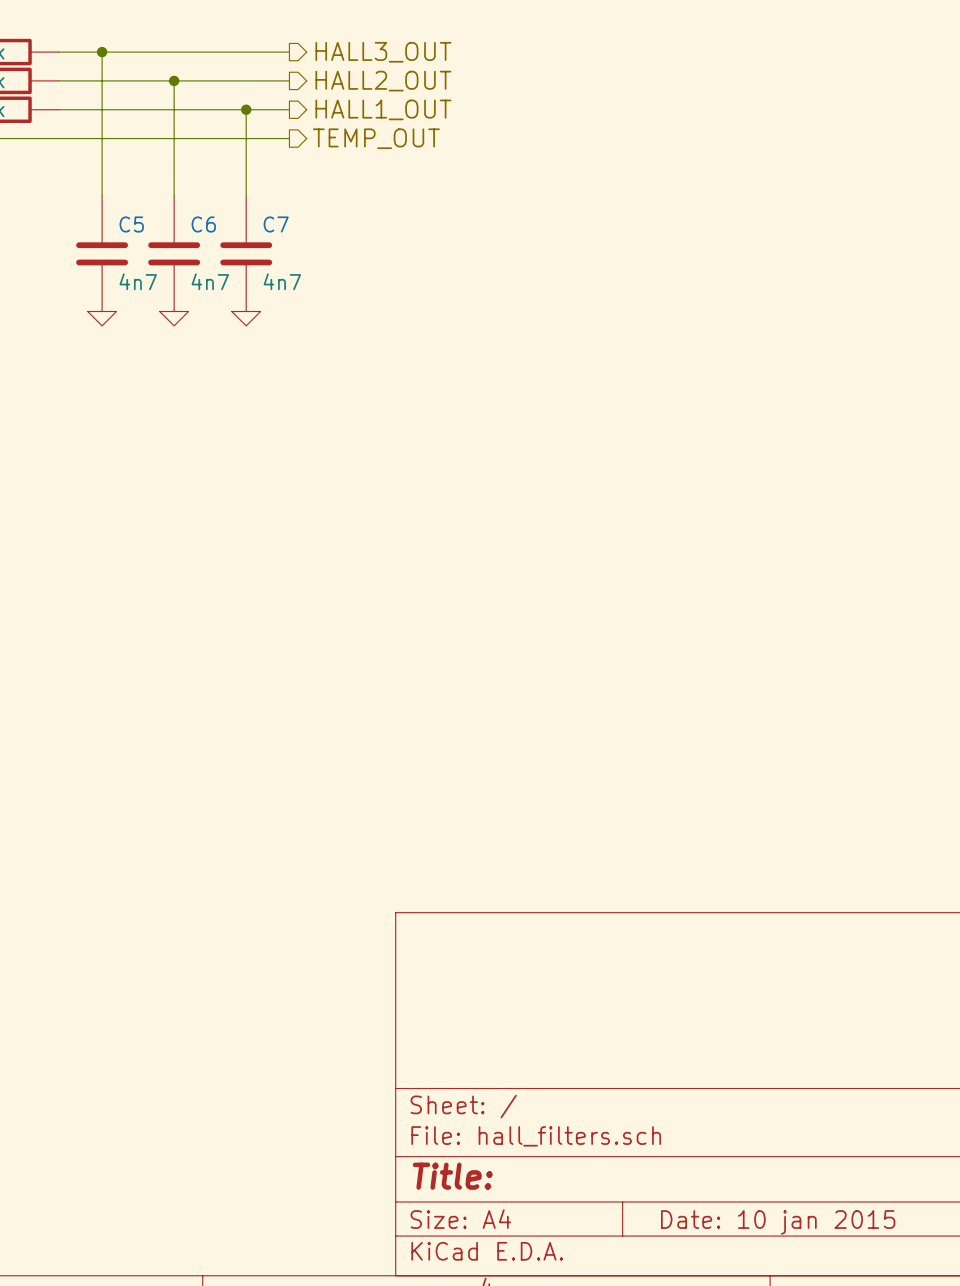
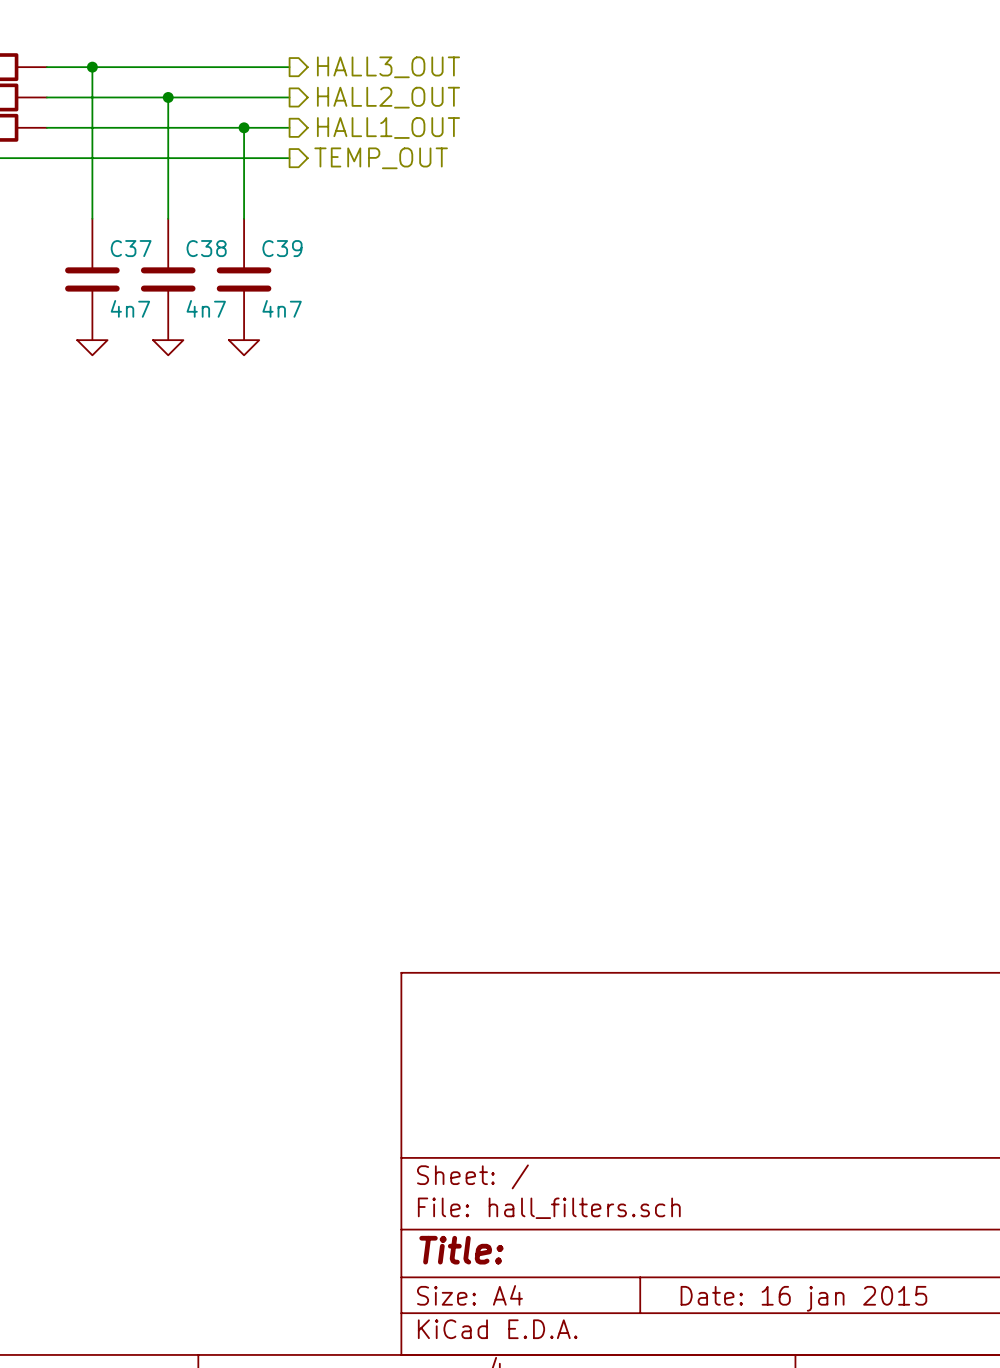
C5 name: C5 (131, 224) -> C37 (131, 248)
C6 name: C6 (203, 224) -> C38 (206, 248)
C7 name: C7 (276, 224) -> C39 (282, 248)
title block: Date: 10 jan 2015 (778, 1222) -> Date: 16 jan 2015 (803, 1298)

